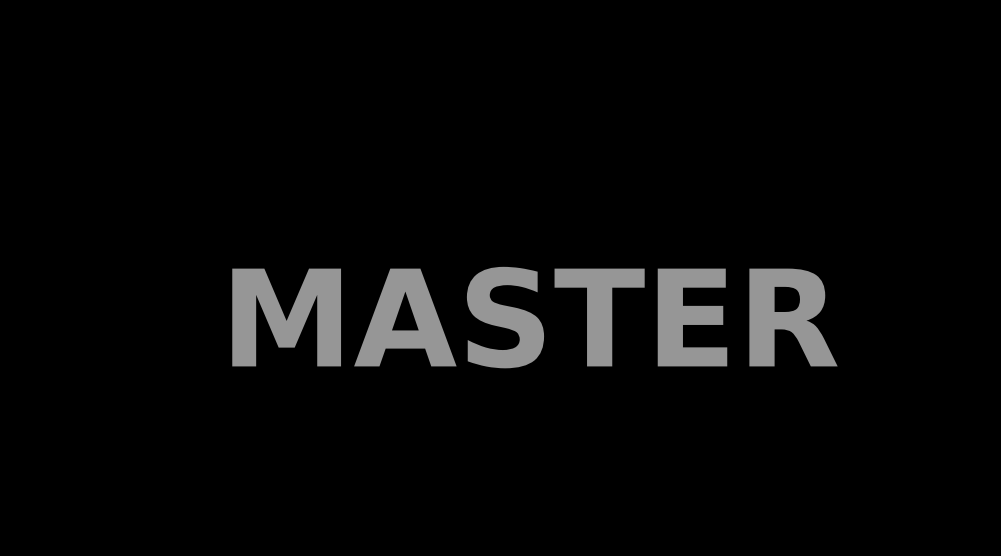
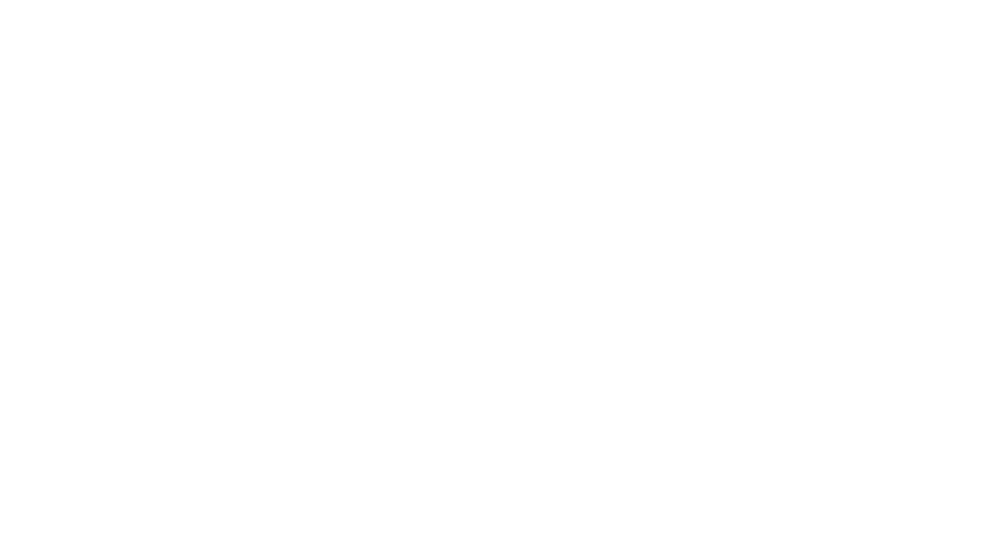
text: MASTER (534, 317) -> none

